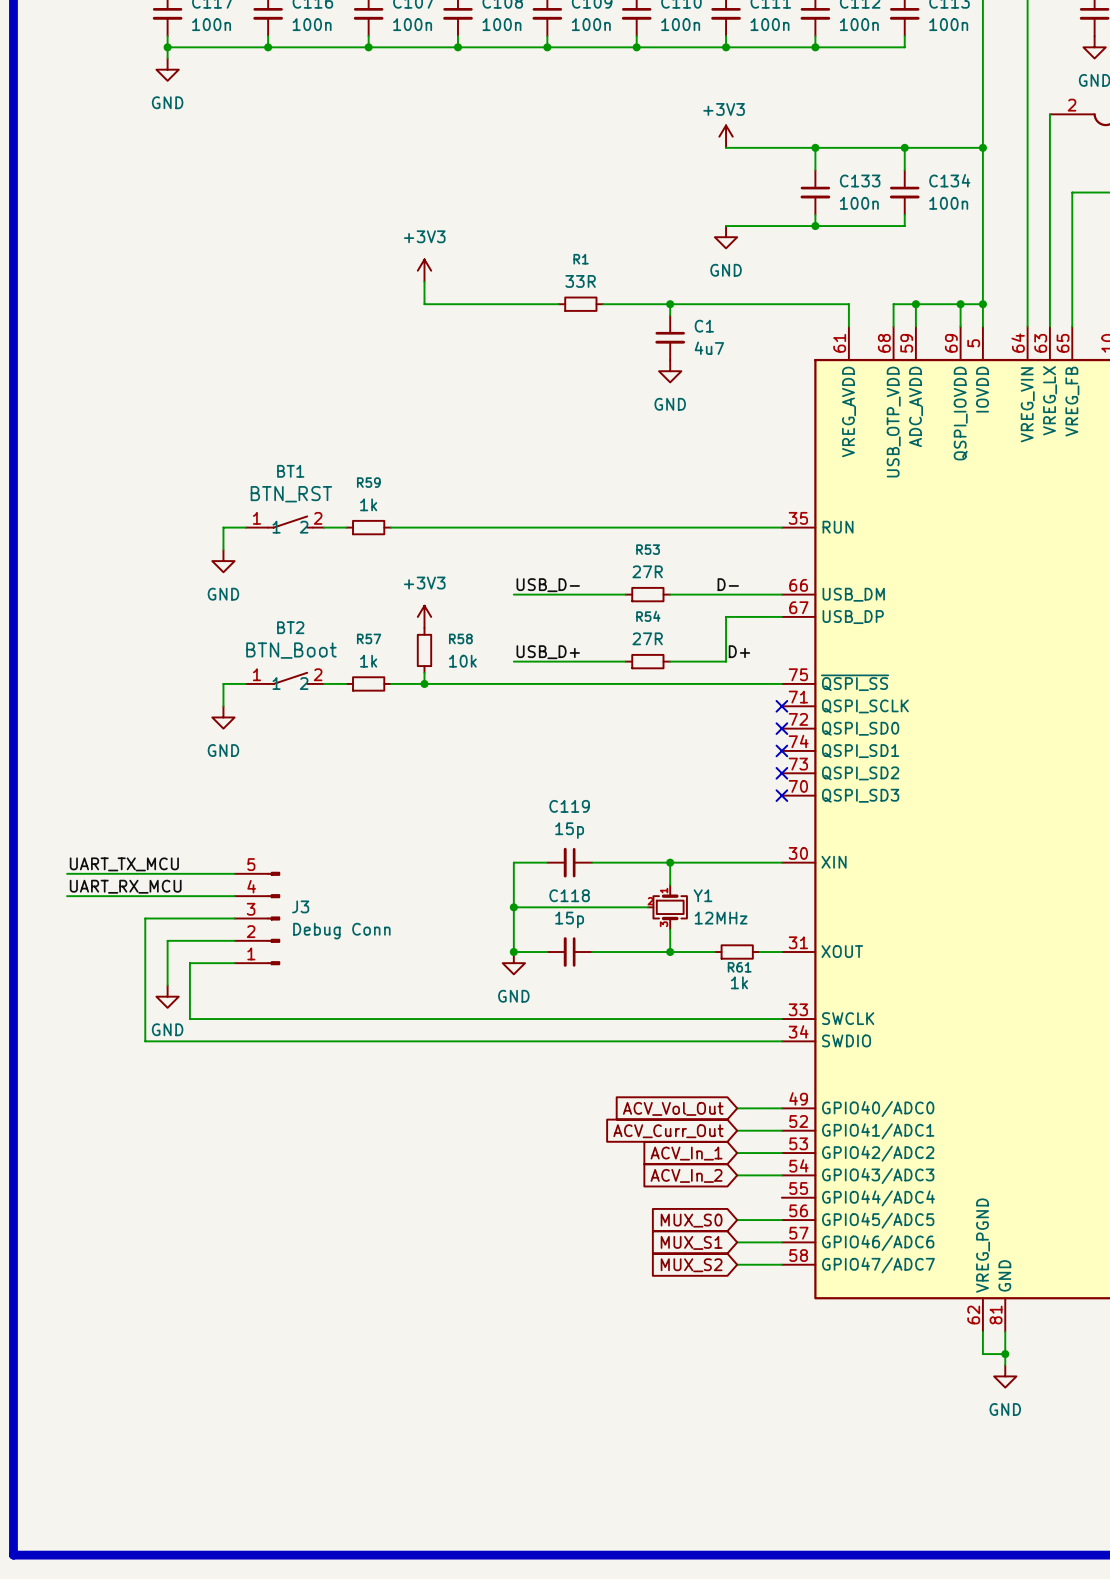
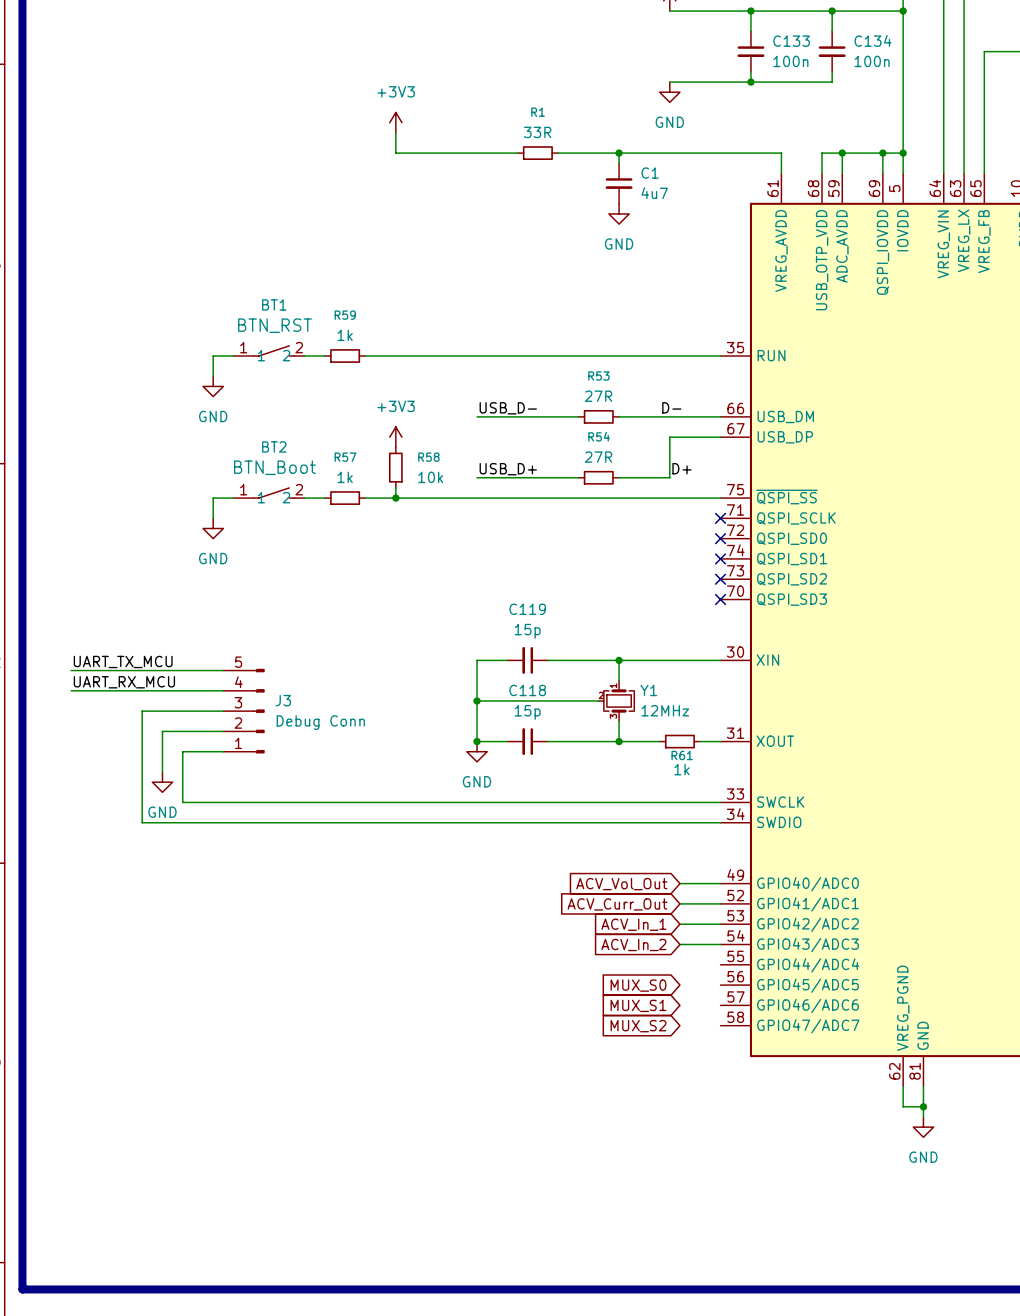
wire: (737, 1220) (781, 1220) -> none
wire: (737, 1242) (781, 1242) -> none
wire: (737, 1264) (781, 1264) -> none

